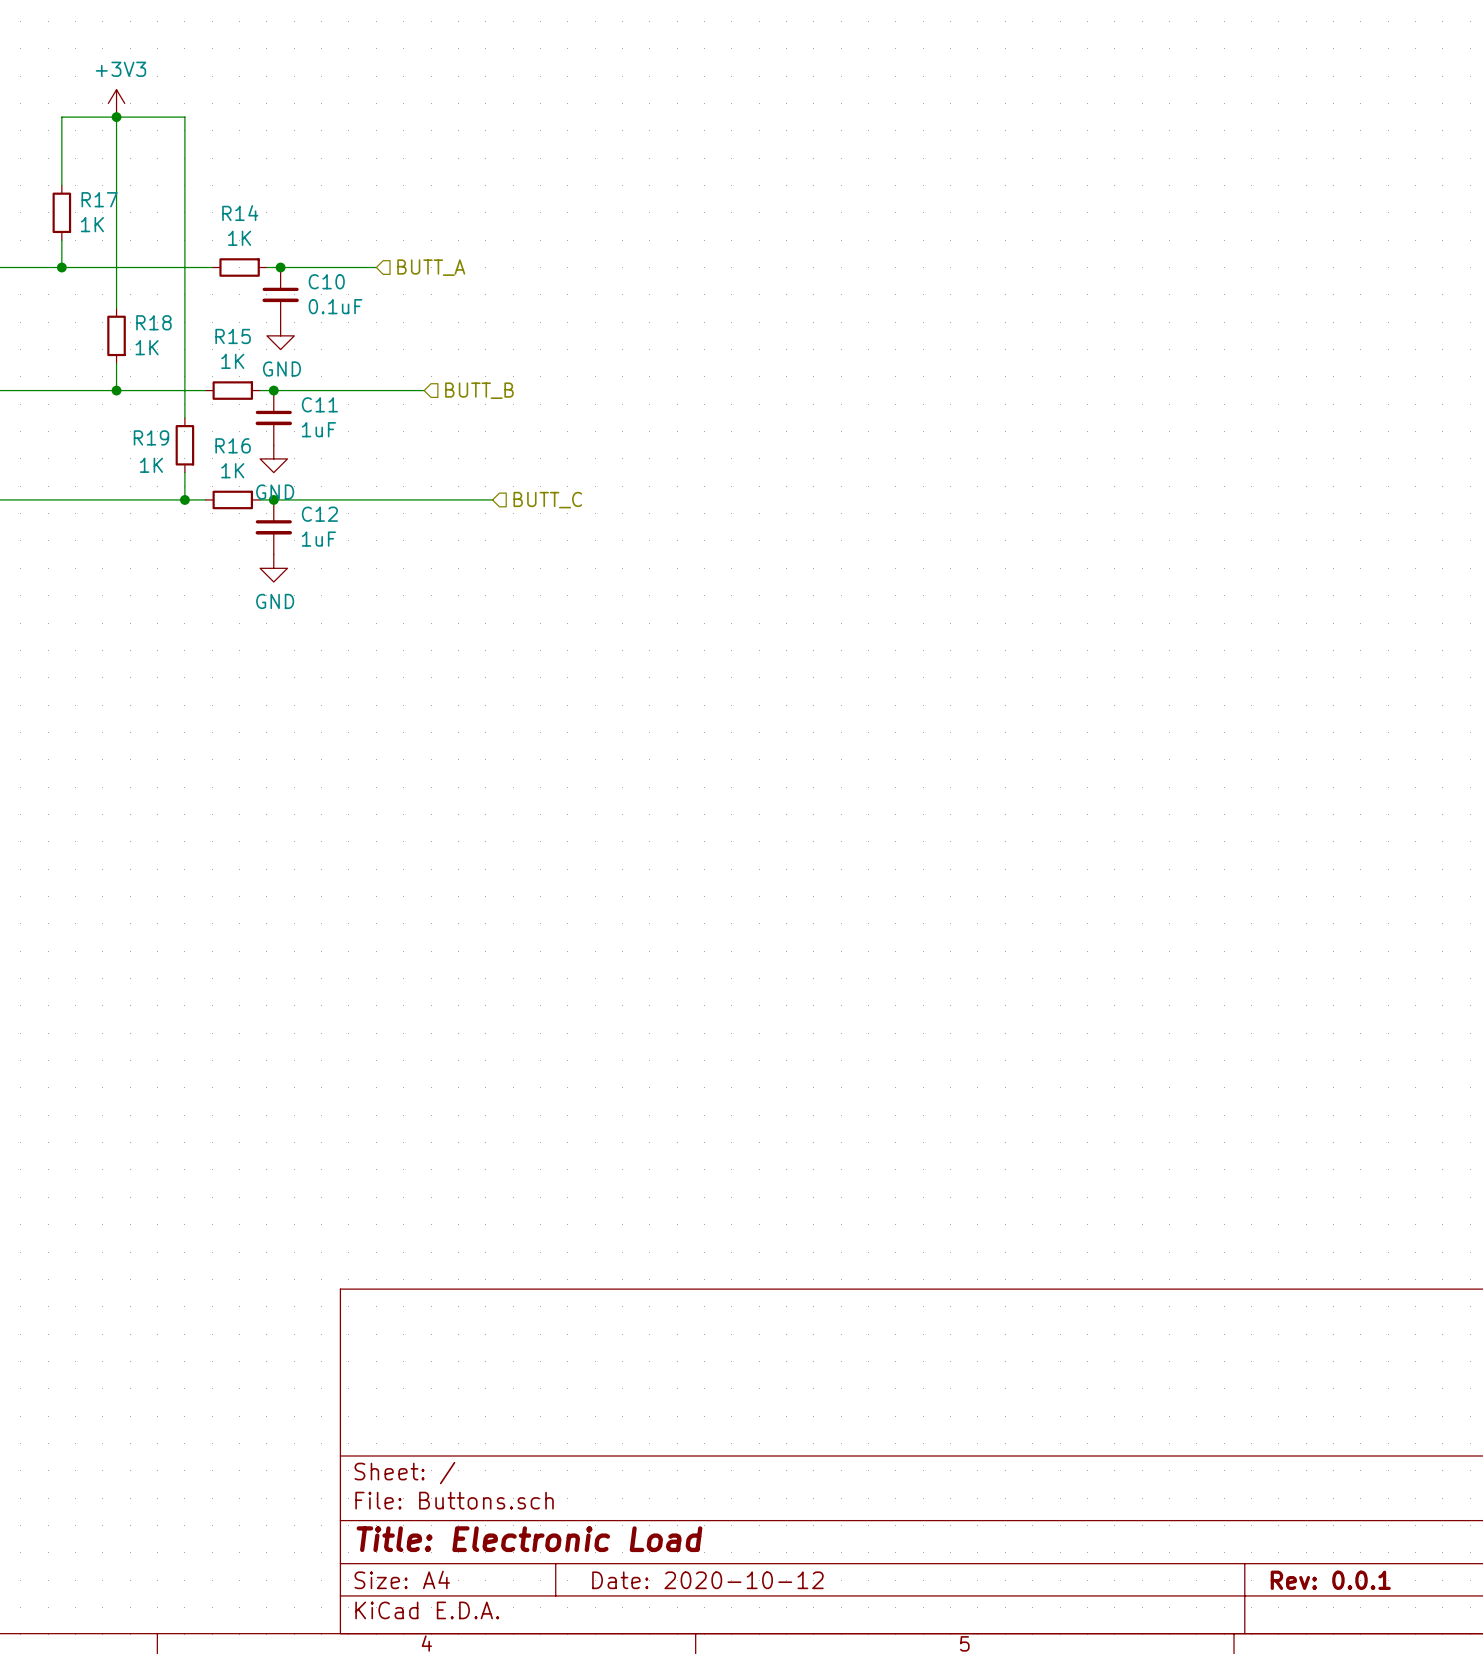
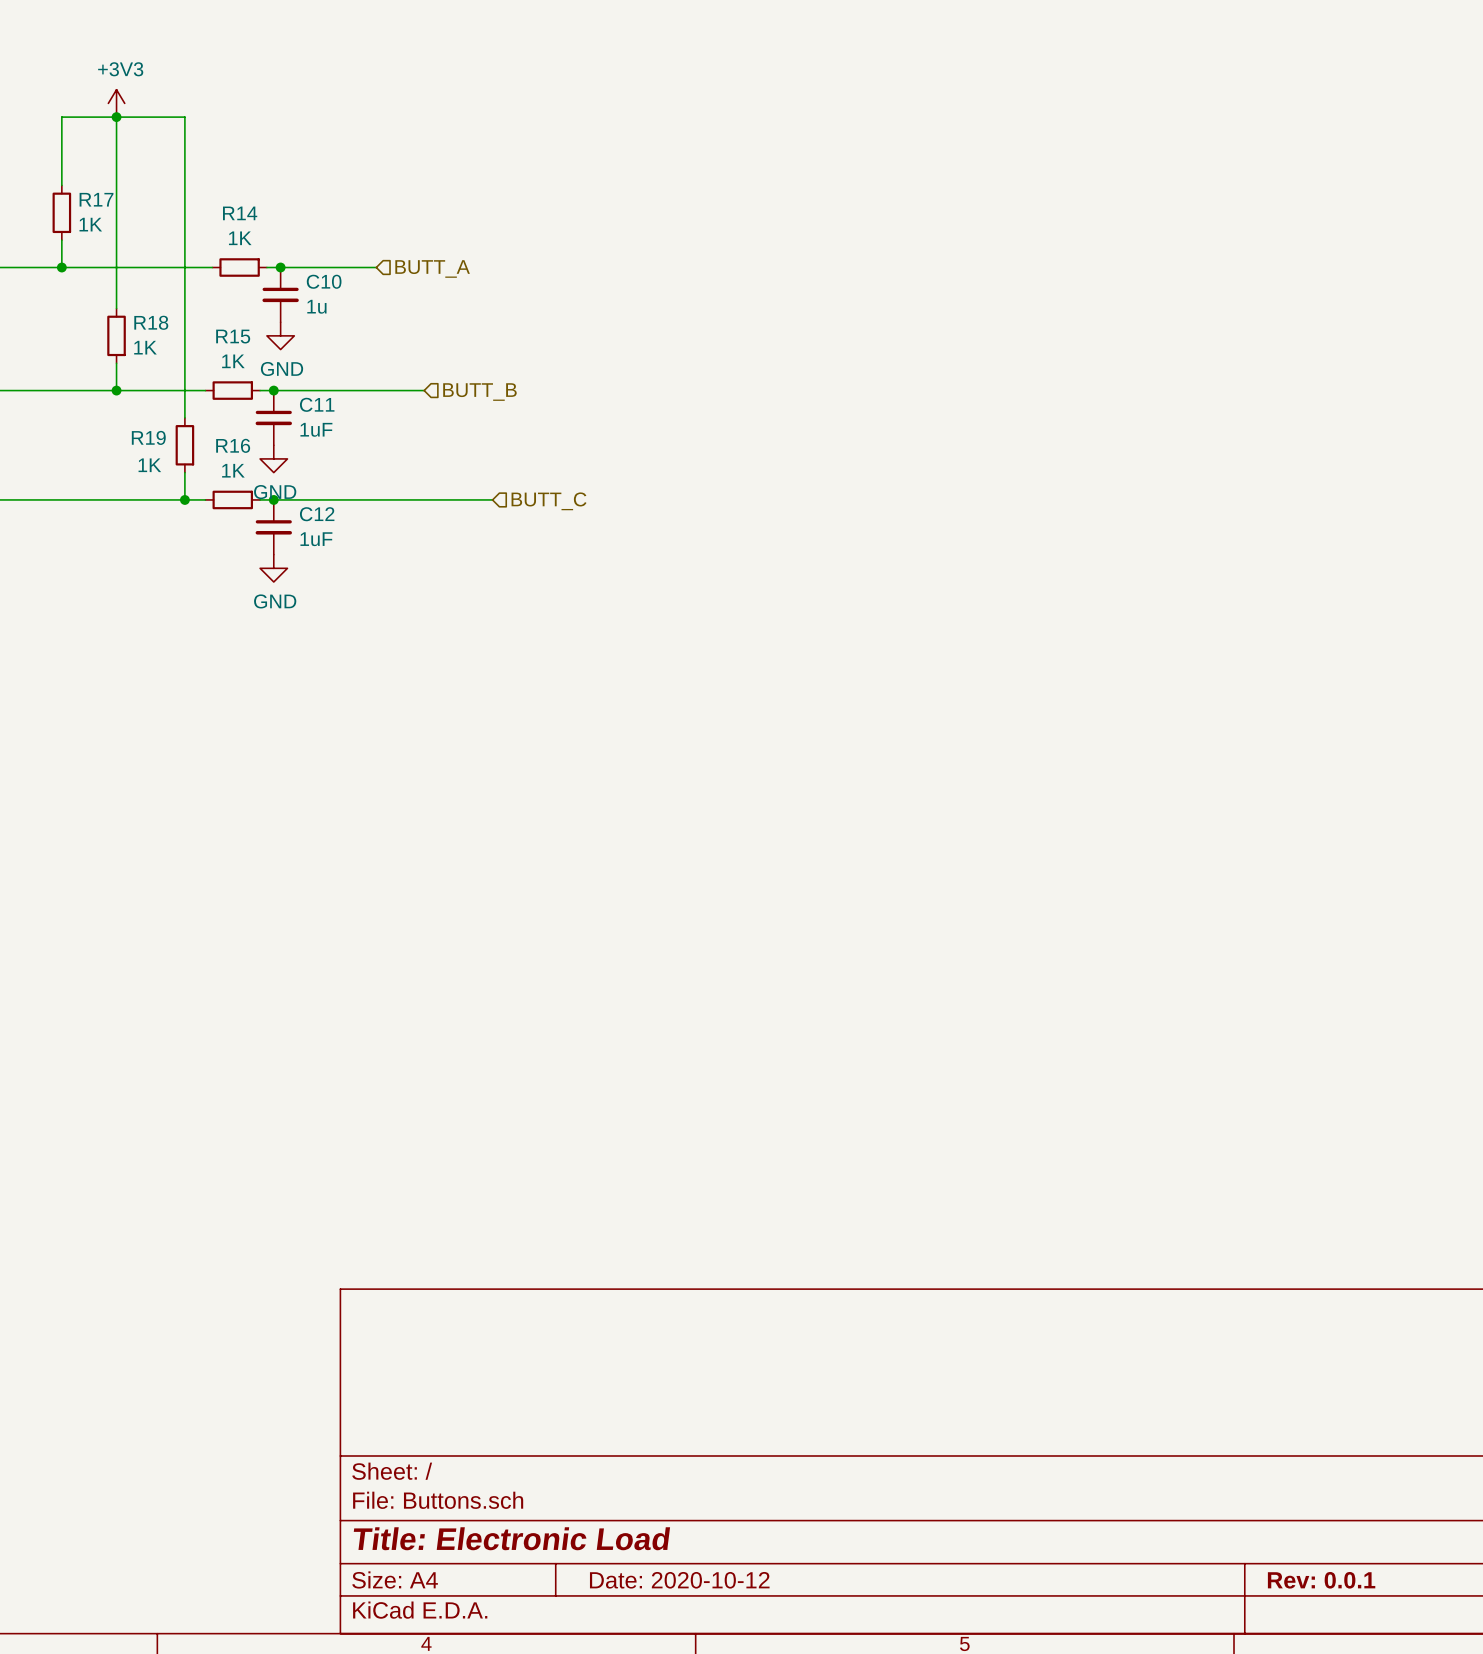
C10 value: 0.1uF (335, 306) -> 1u (316, 306)

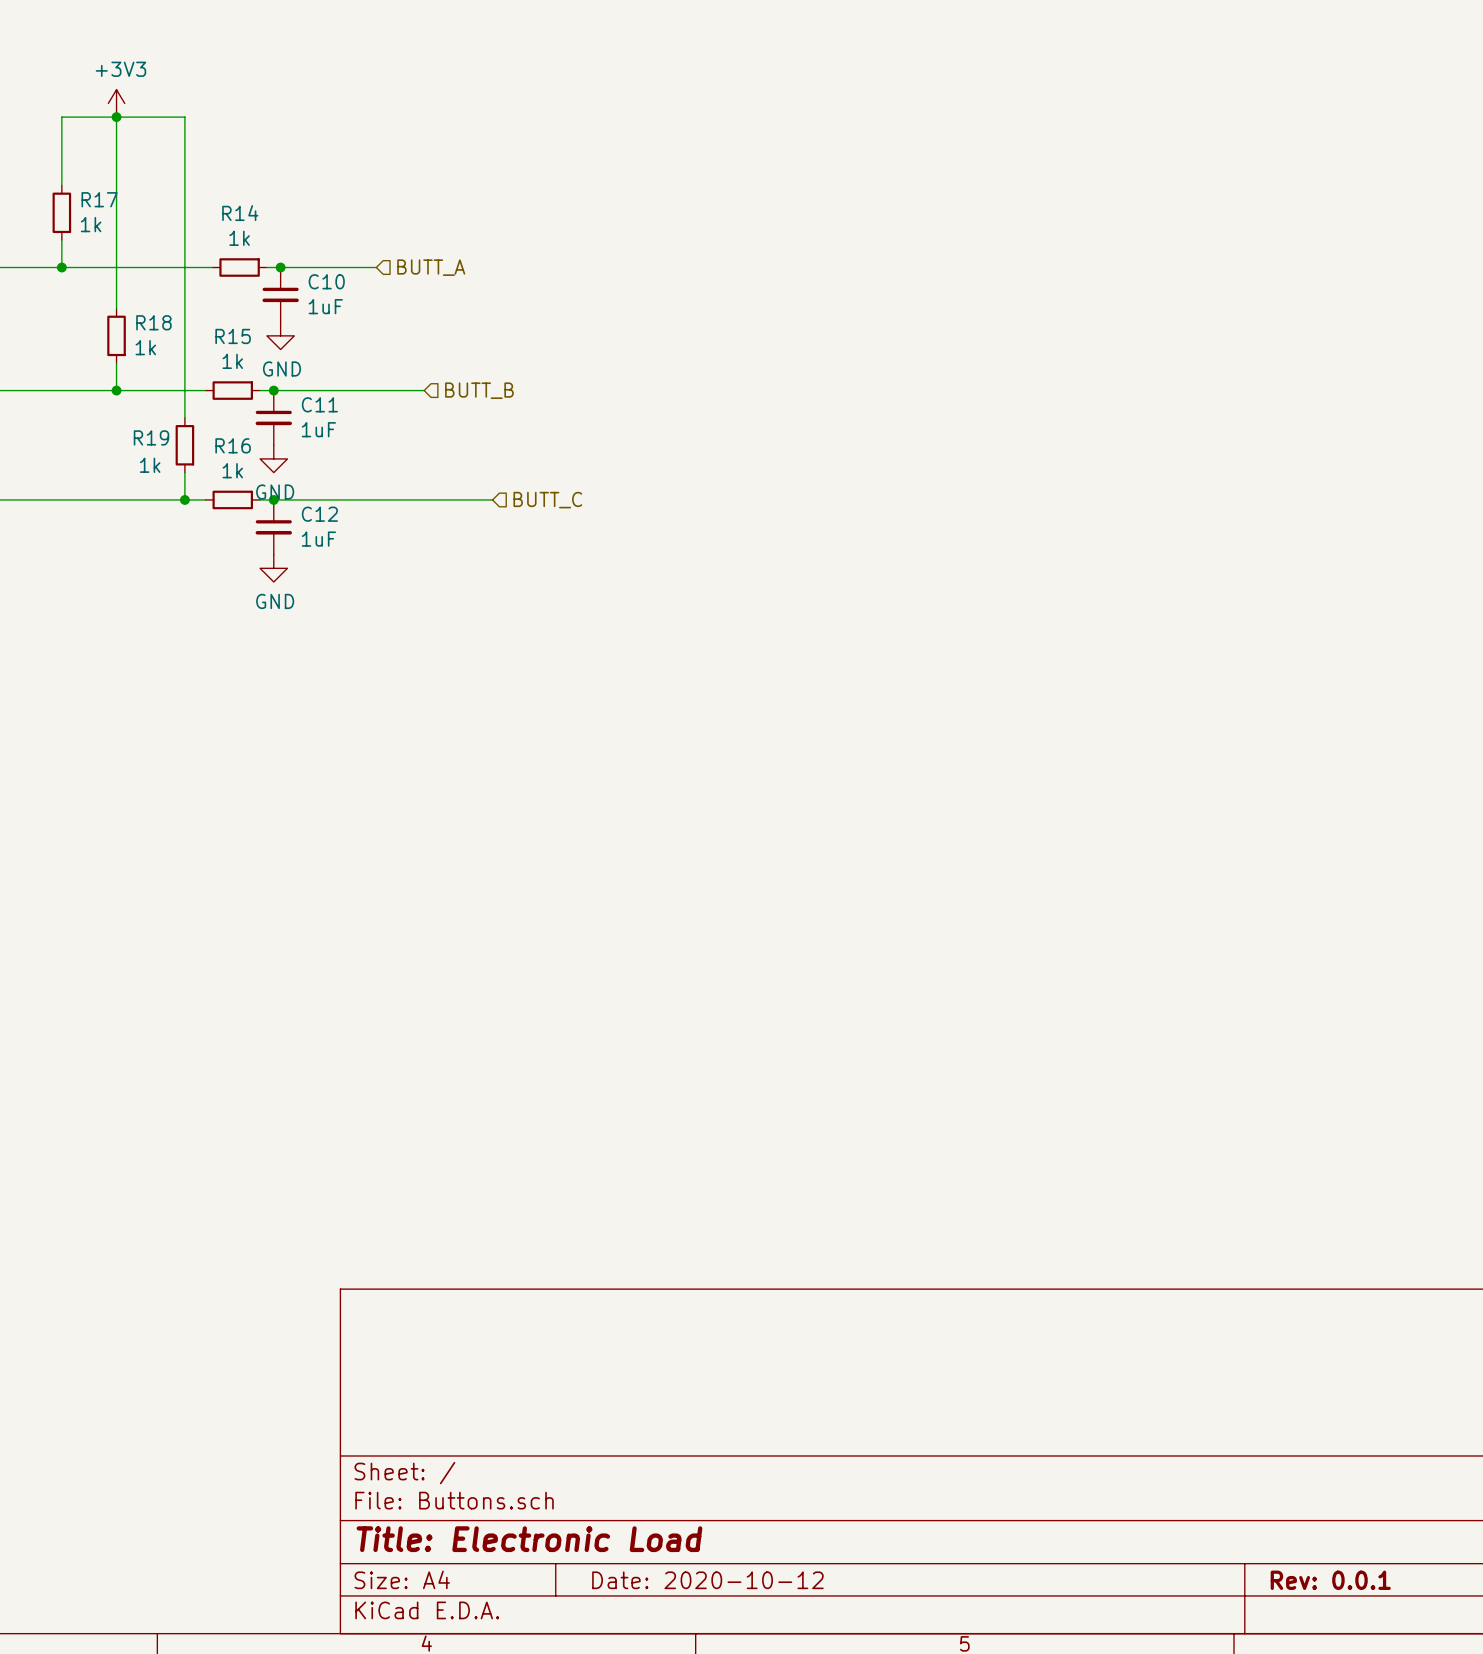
R17 value: 1K (90, 224) -> 1k (91, 224)
R14 value: 1K (240, 238) -> 1k (239, 238)
C10 value: 1u (316, 306) -> 1uF (325, 306)
R18 value: 1K (145, 347) -> 1k (145, 347)
R15 value: 1K (233, 361) -> 1k (232, 361)
R19 value: 1K (149, 465) -> 1k (150, 465)
R16 value: 1K (233, 470) -> 1k (232, 470)

